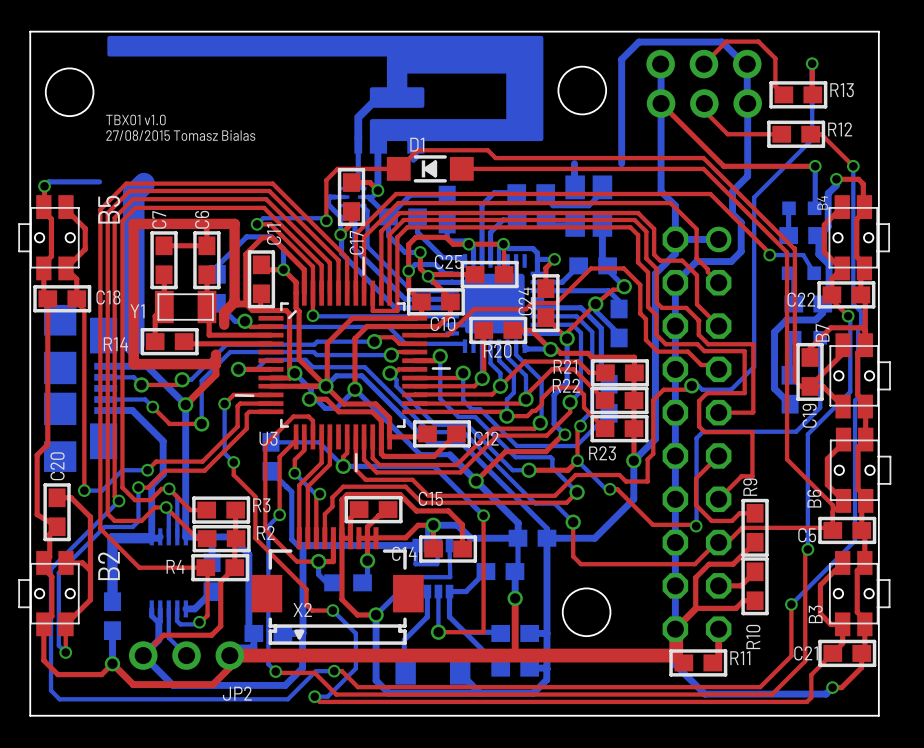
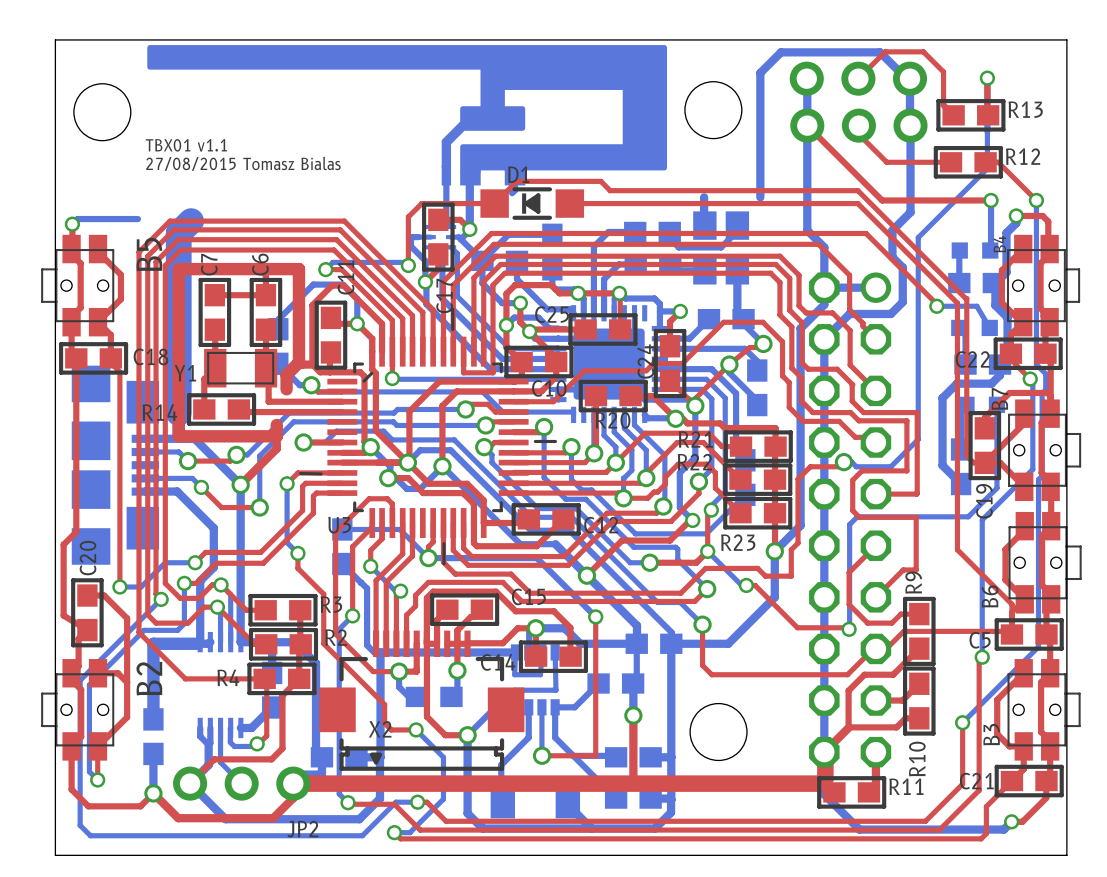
text: TBX01 v1.0 (135, 119) -> TBX01 v1.1 (186, 145)

